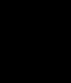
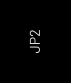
drawing: none -> [29, 30, 40, 54]

